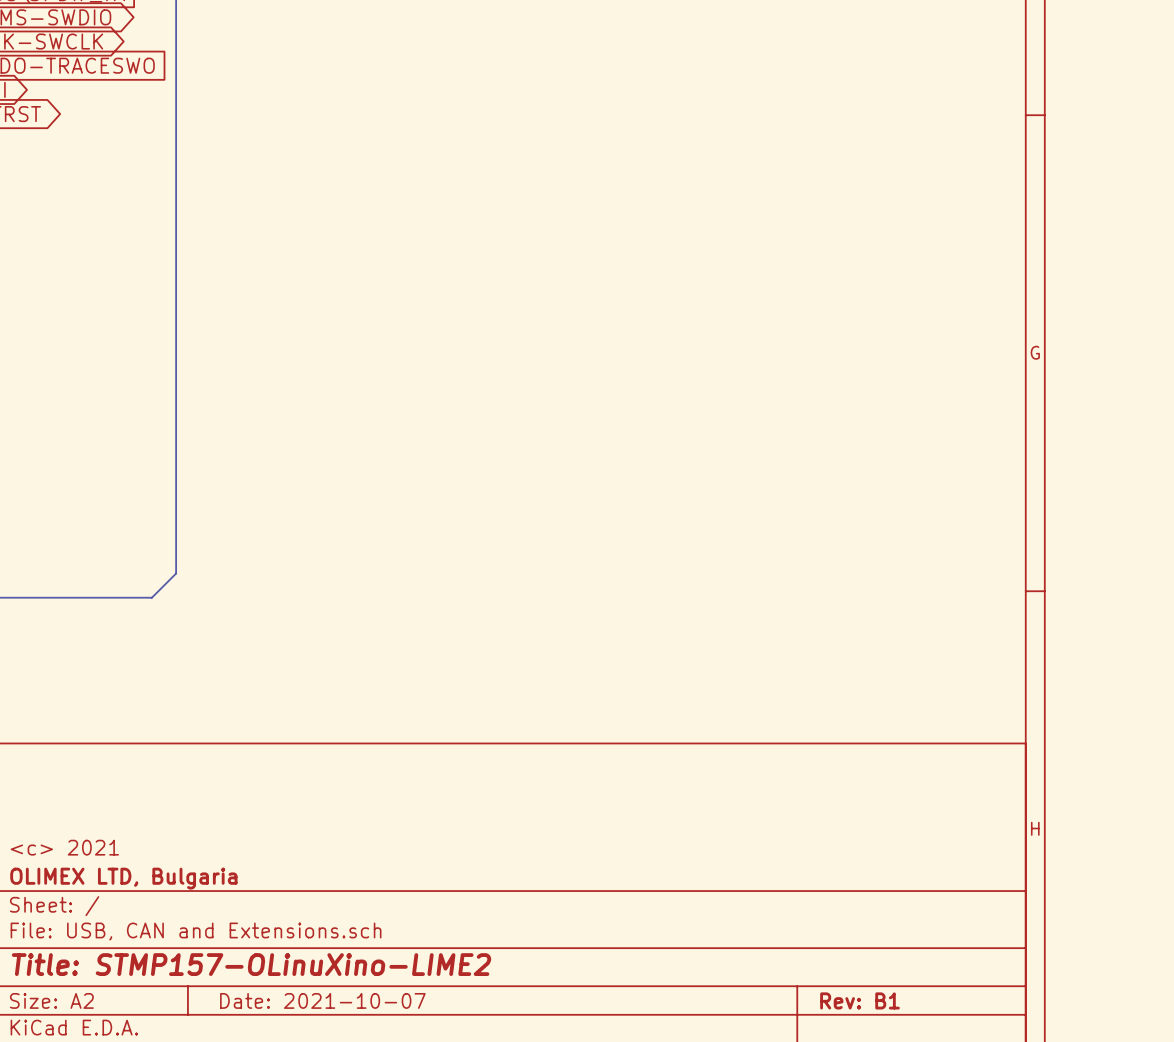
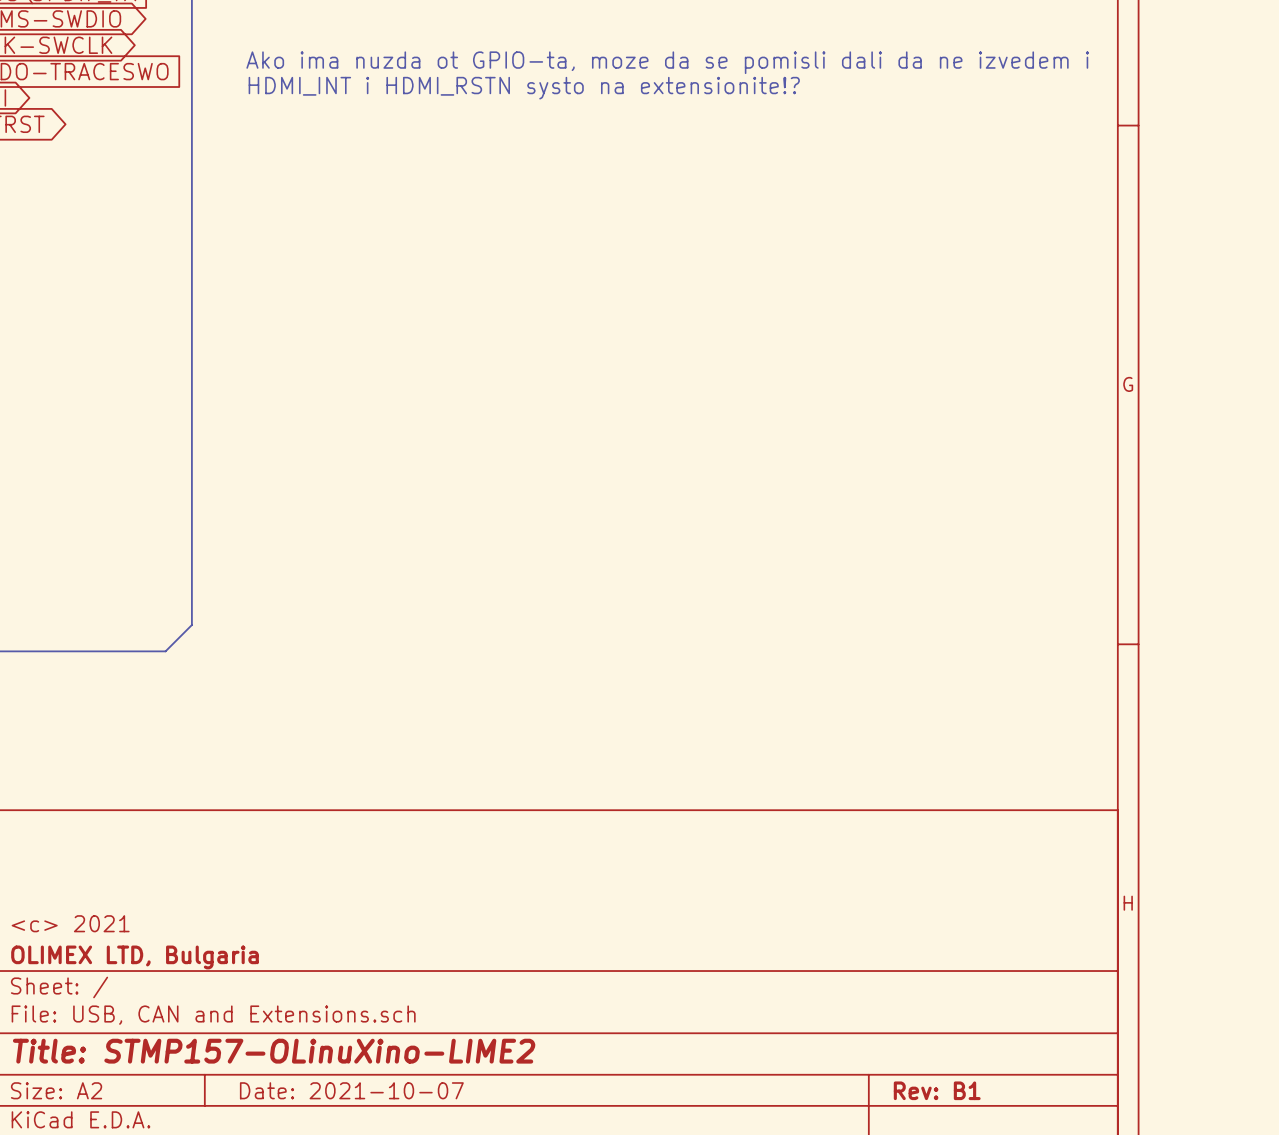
text: none -> Ako ima nuzda ot GPIO-ta, moze da se pomisli dali da ne izvedem i (667, 62)
text: none -> HDMI_INT i HDMI_RSTN systo na extensionite!? (524, 88)

